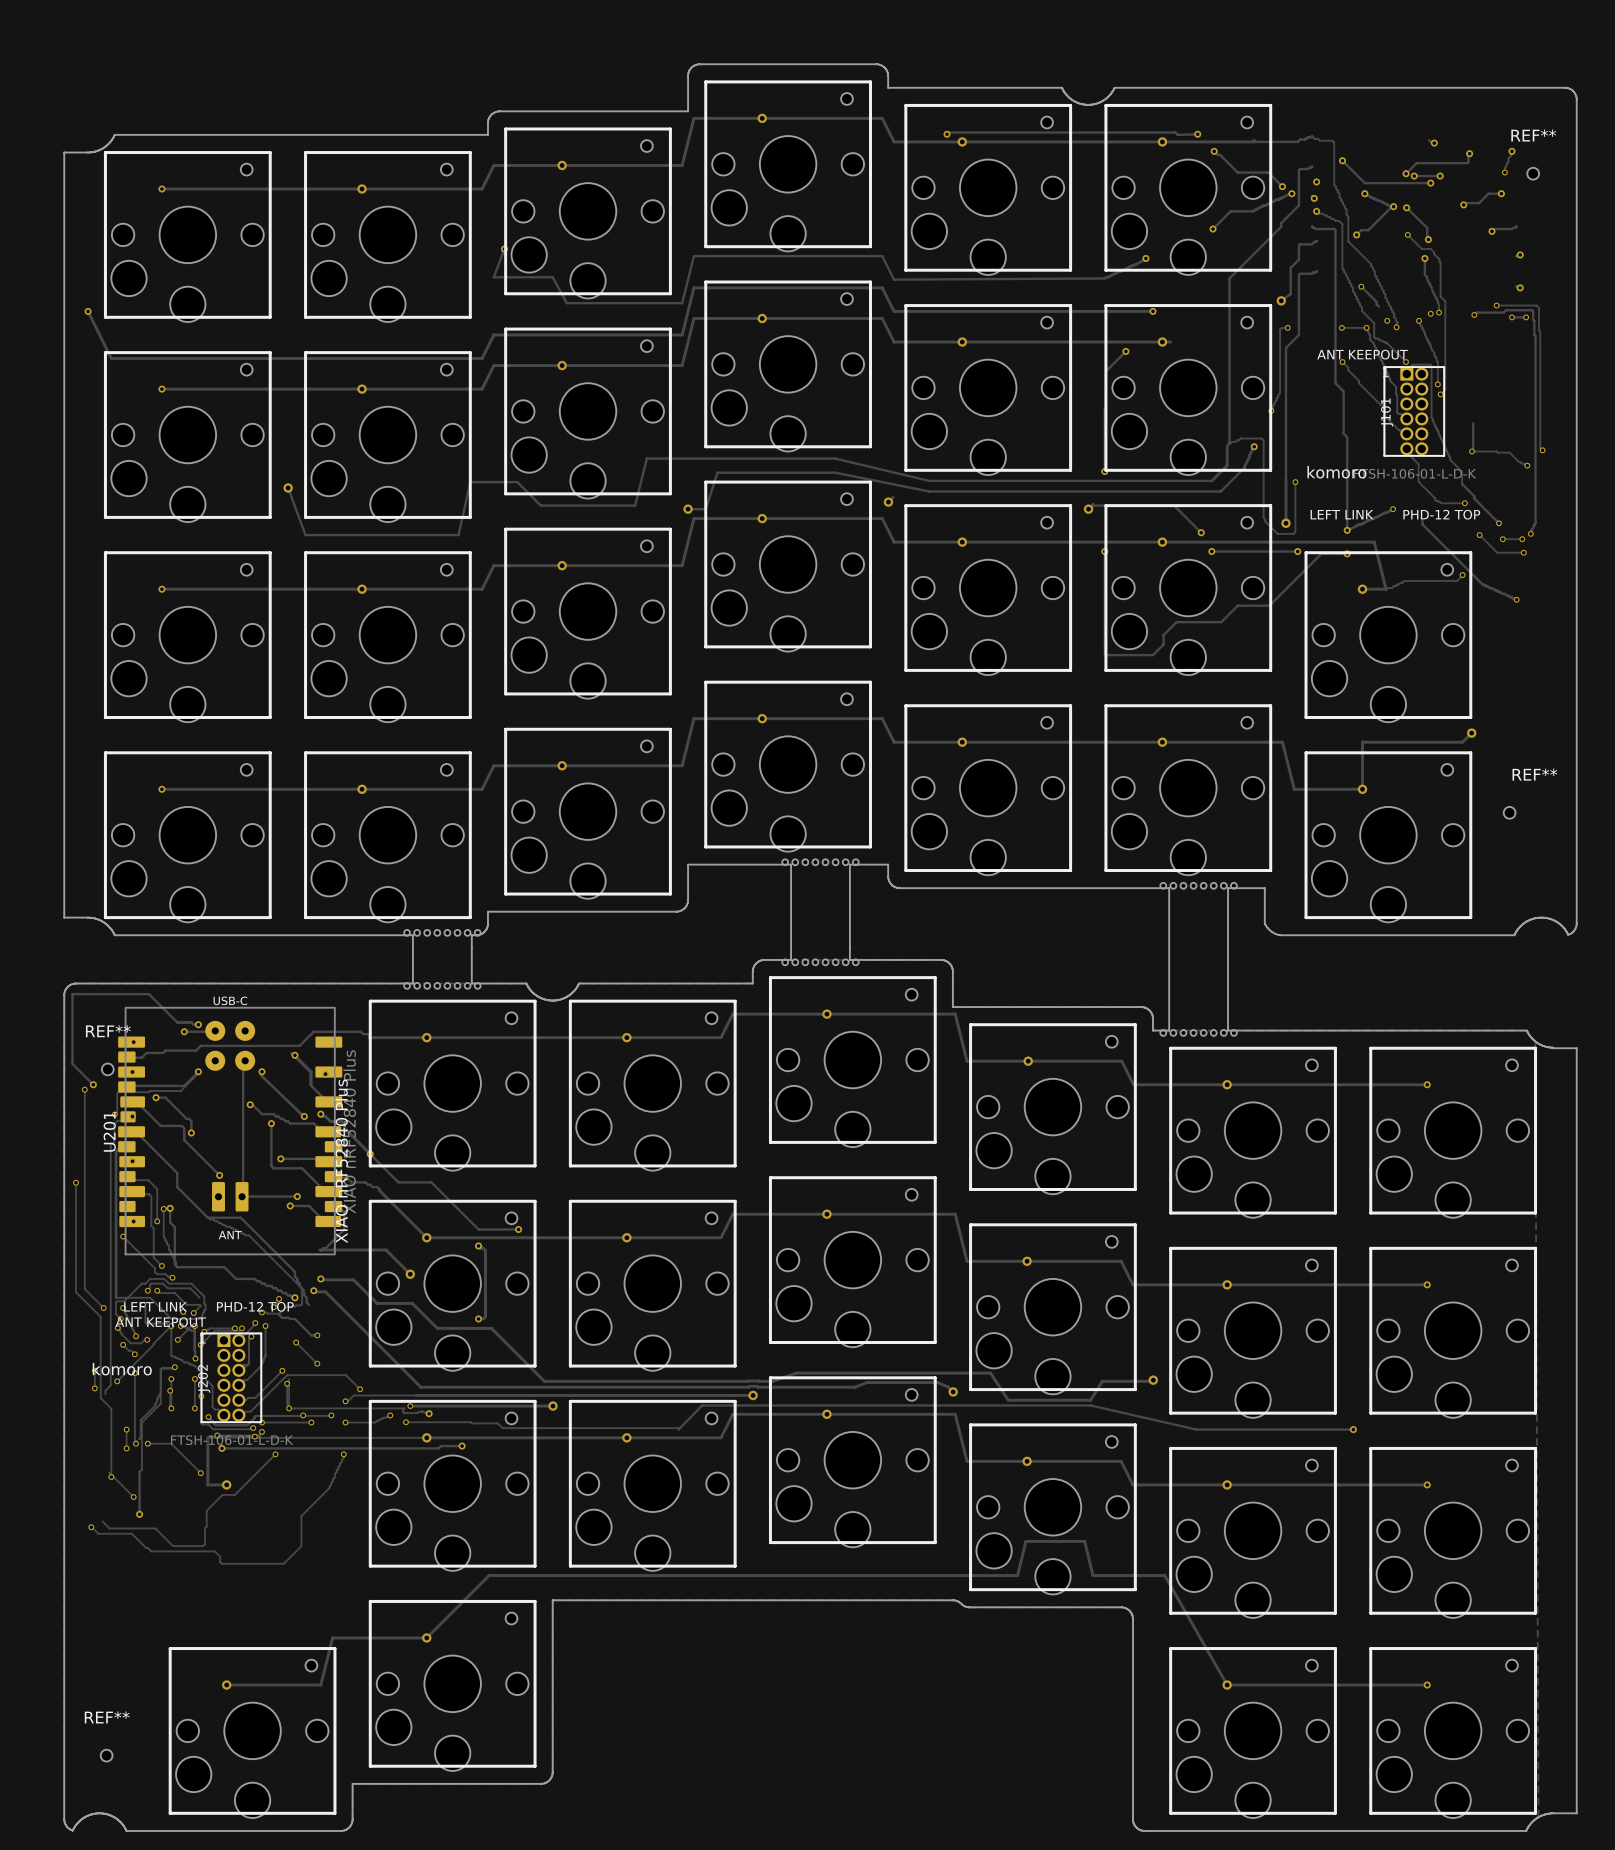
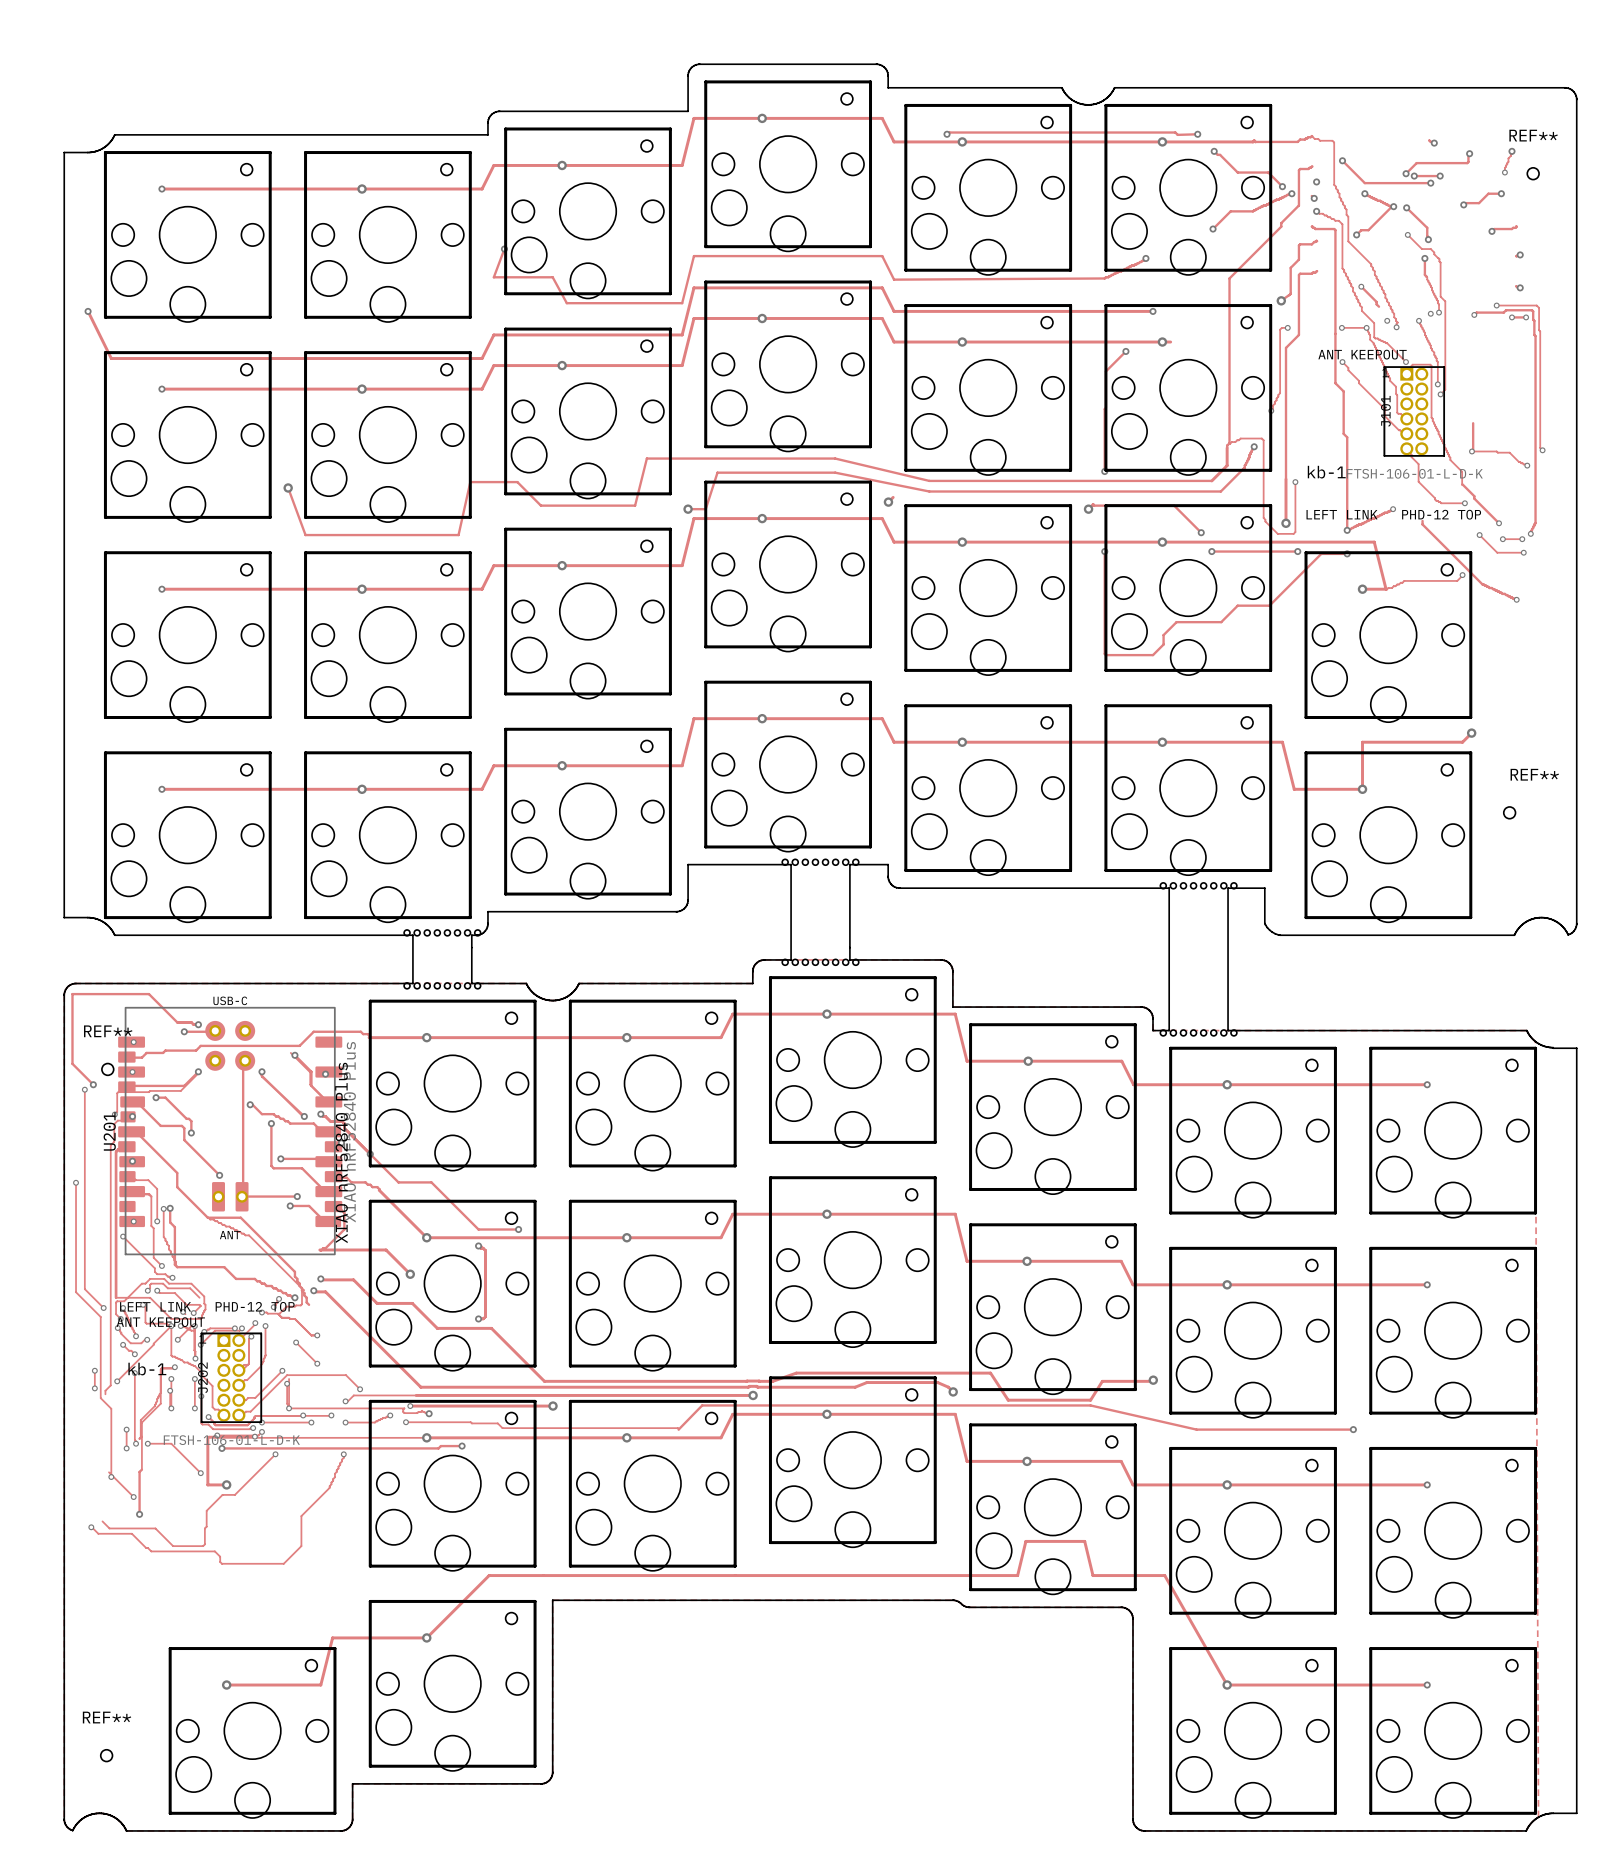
text: komoro (1336, 472) -> kb-1 (1326, 472)
text: komoro (122, 1369) -> none
text: none -> kb-1 (147, 1369)

